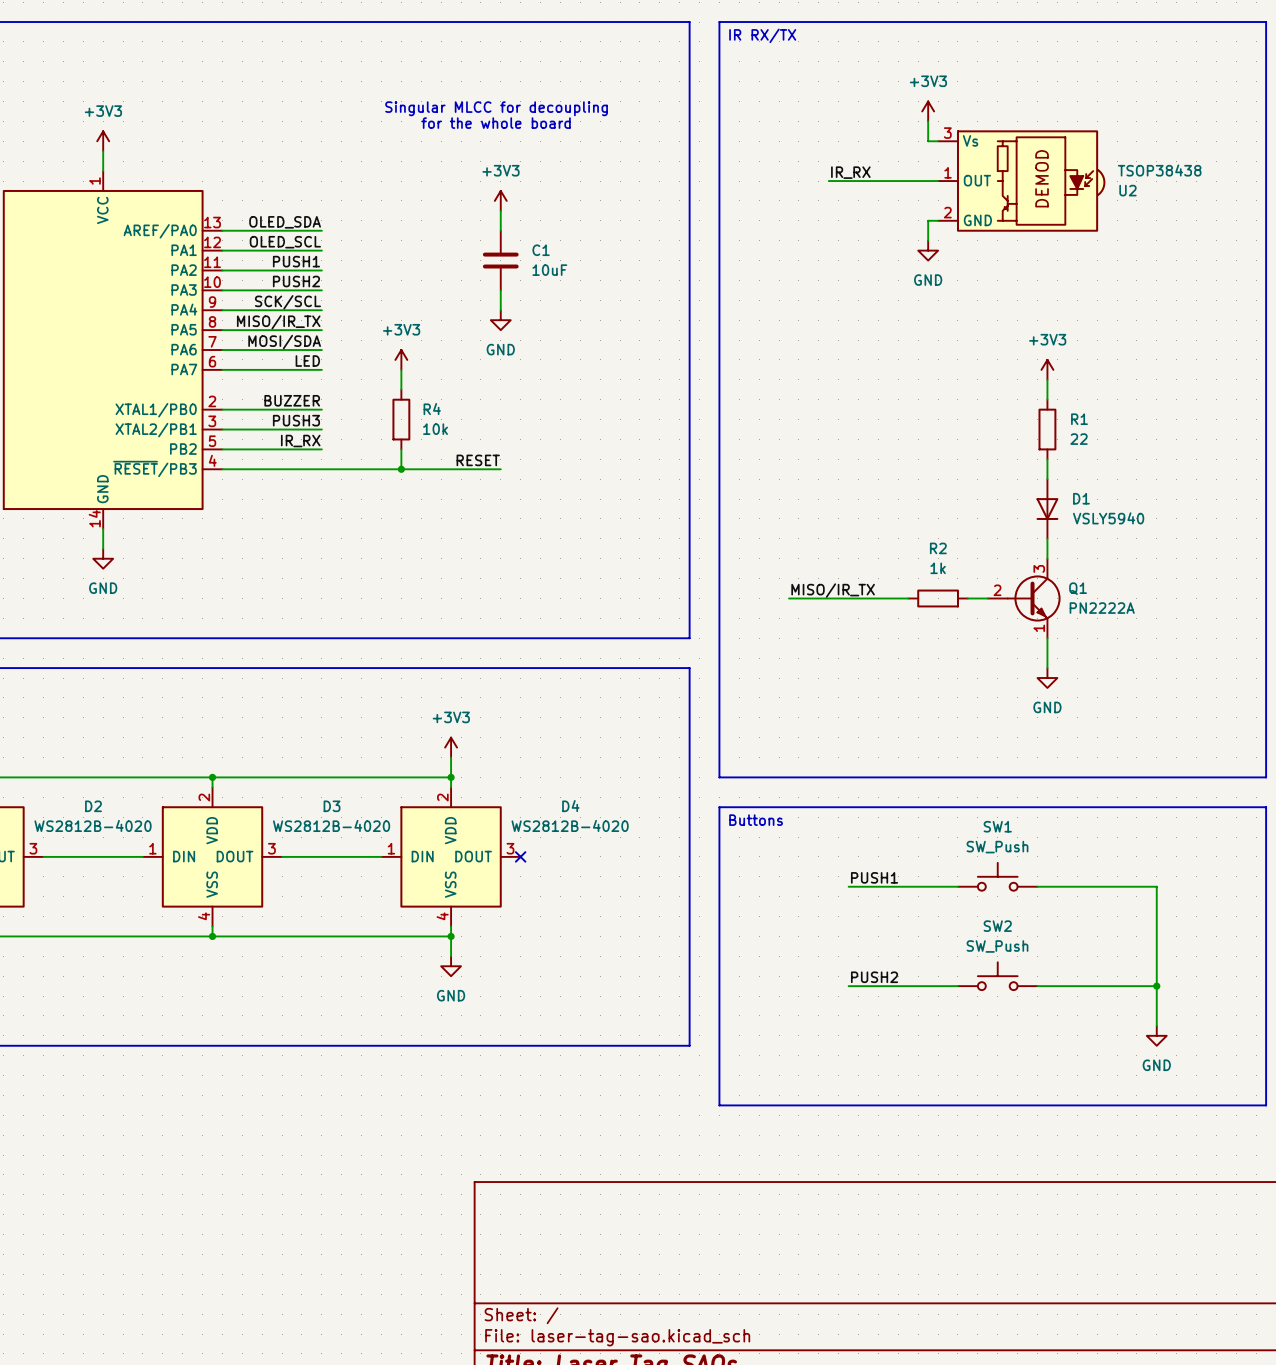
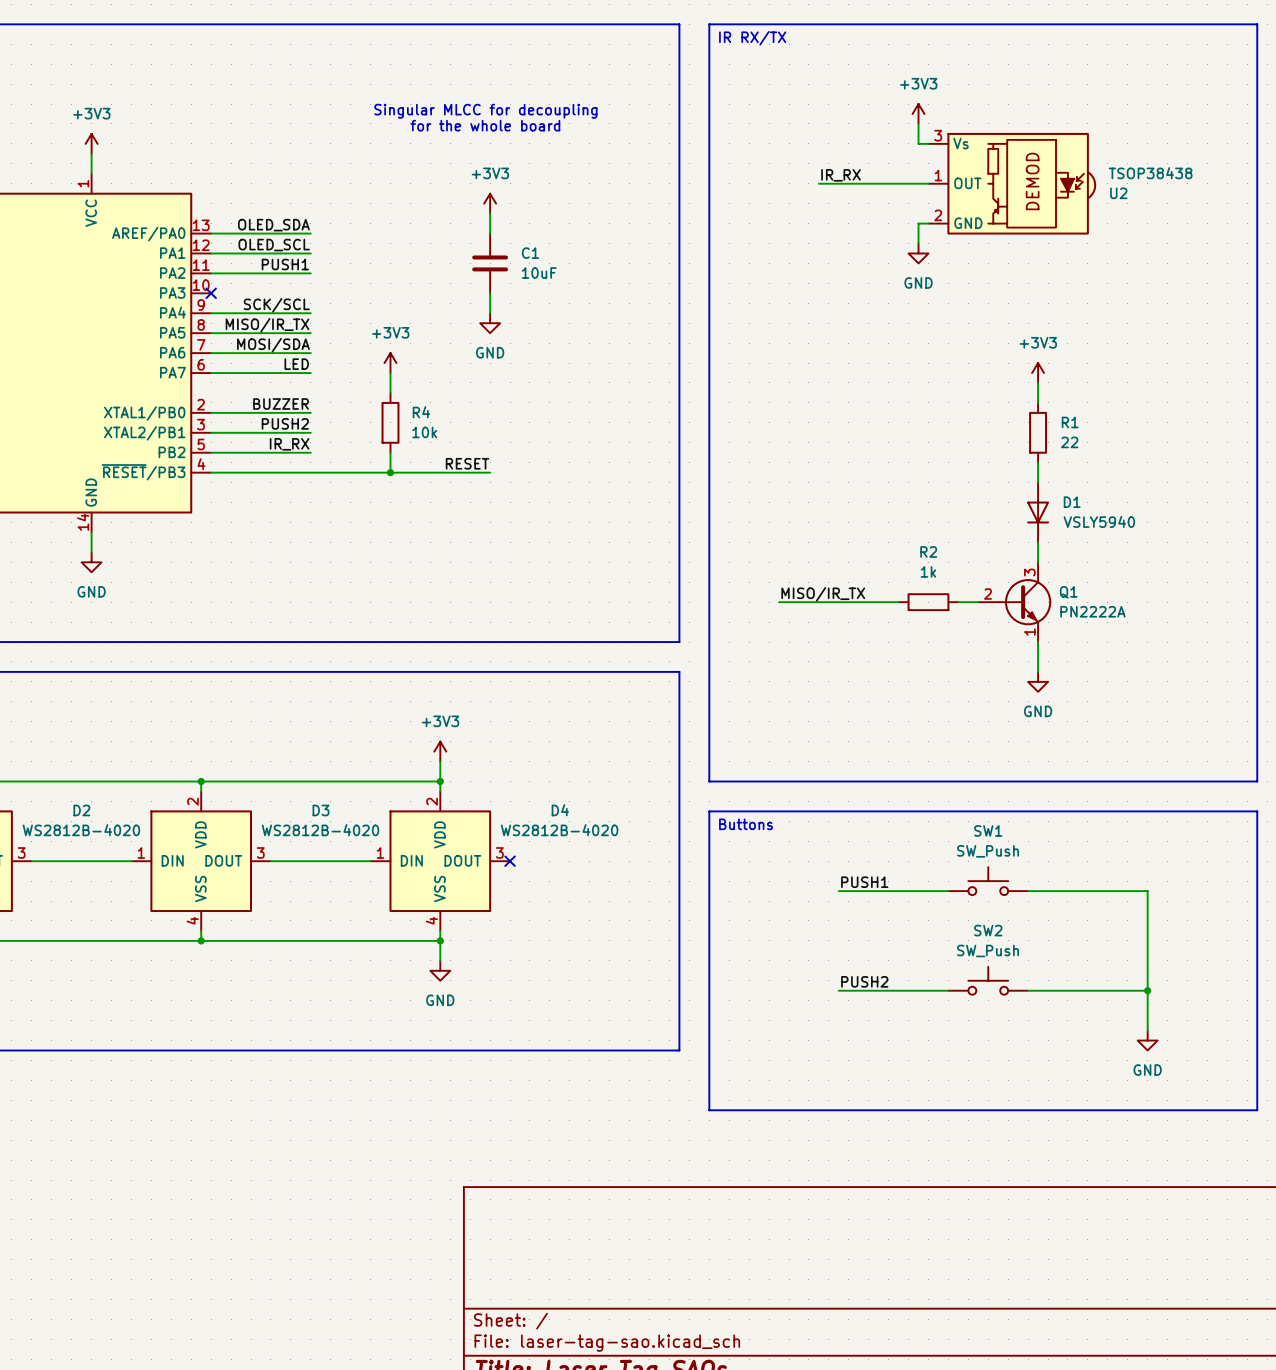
label: PUSH2 (296, 281) -> none
wire: (222, 290) (321, 290) -> none
no-connect mark: none -> (211, 293)
label: PUSH3 (296, 420) -> PUSH2 (285, 423)

